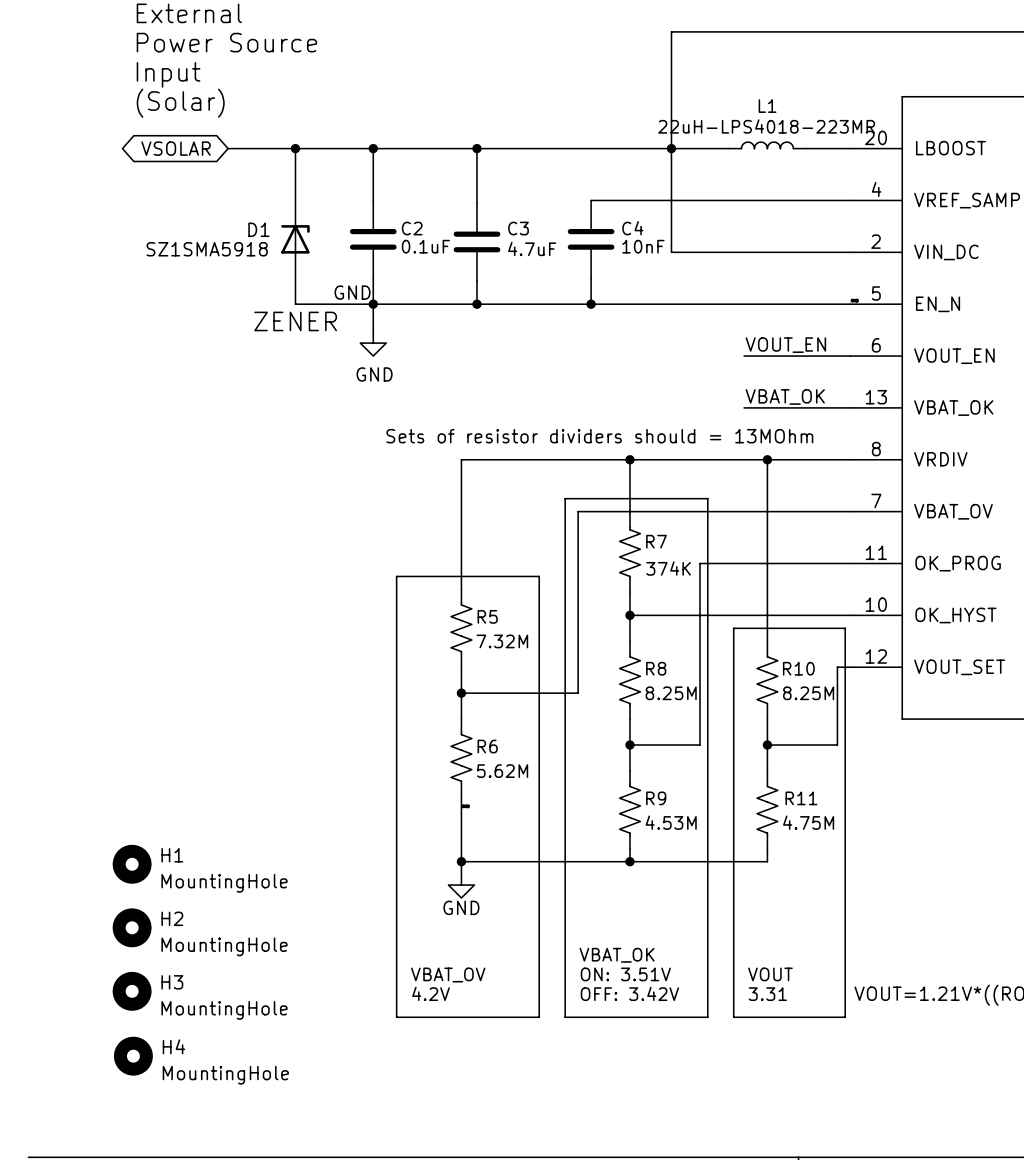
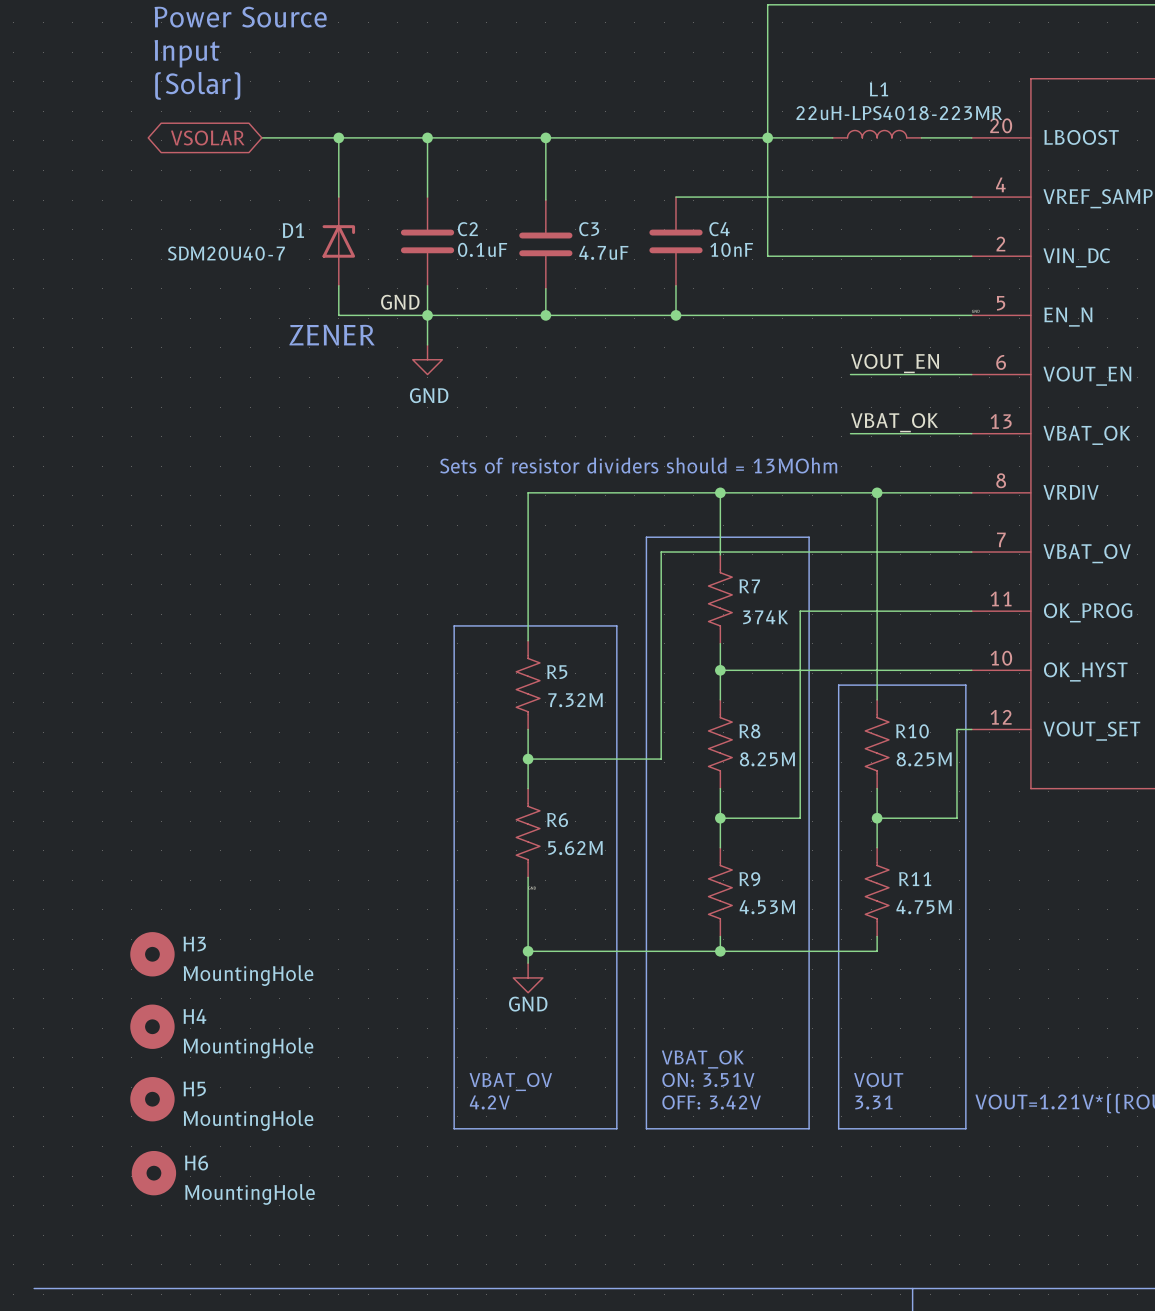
D1 value: SZ1SMA5918 (207, 249) -> SDM20U40-7 (226, 253)
H1 name: H1 (172, 855) -> H3 (194, 944)
H2 name: H2 (172, 918) -> H4 (194, 1016)
H3 name: H3 (172, 982) -> H5 (194, 1088)
H4 name: H4 (173, 1046) -> H6 (196, 1162)

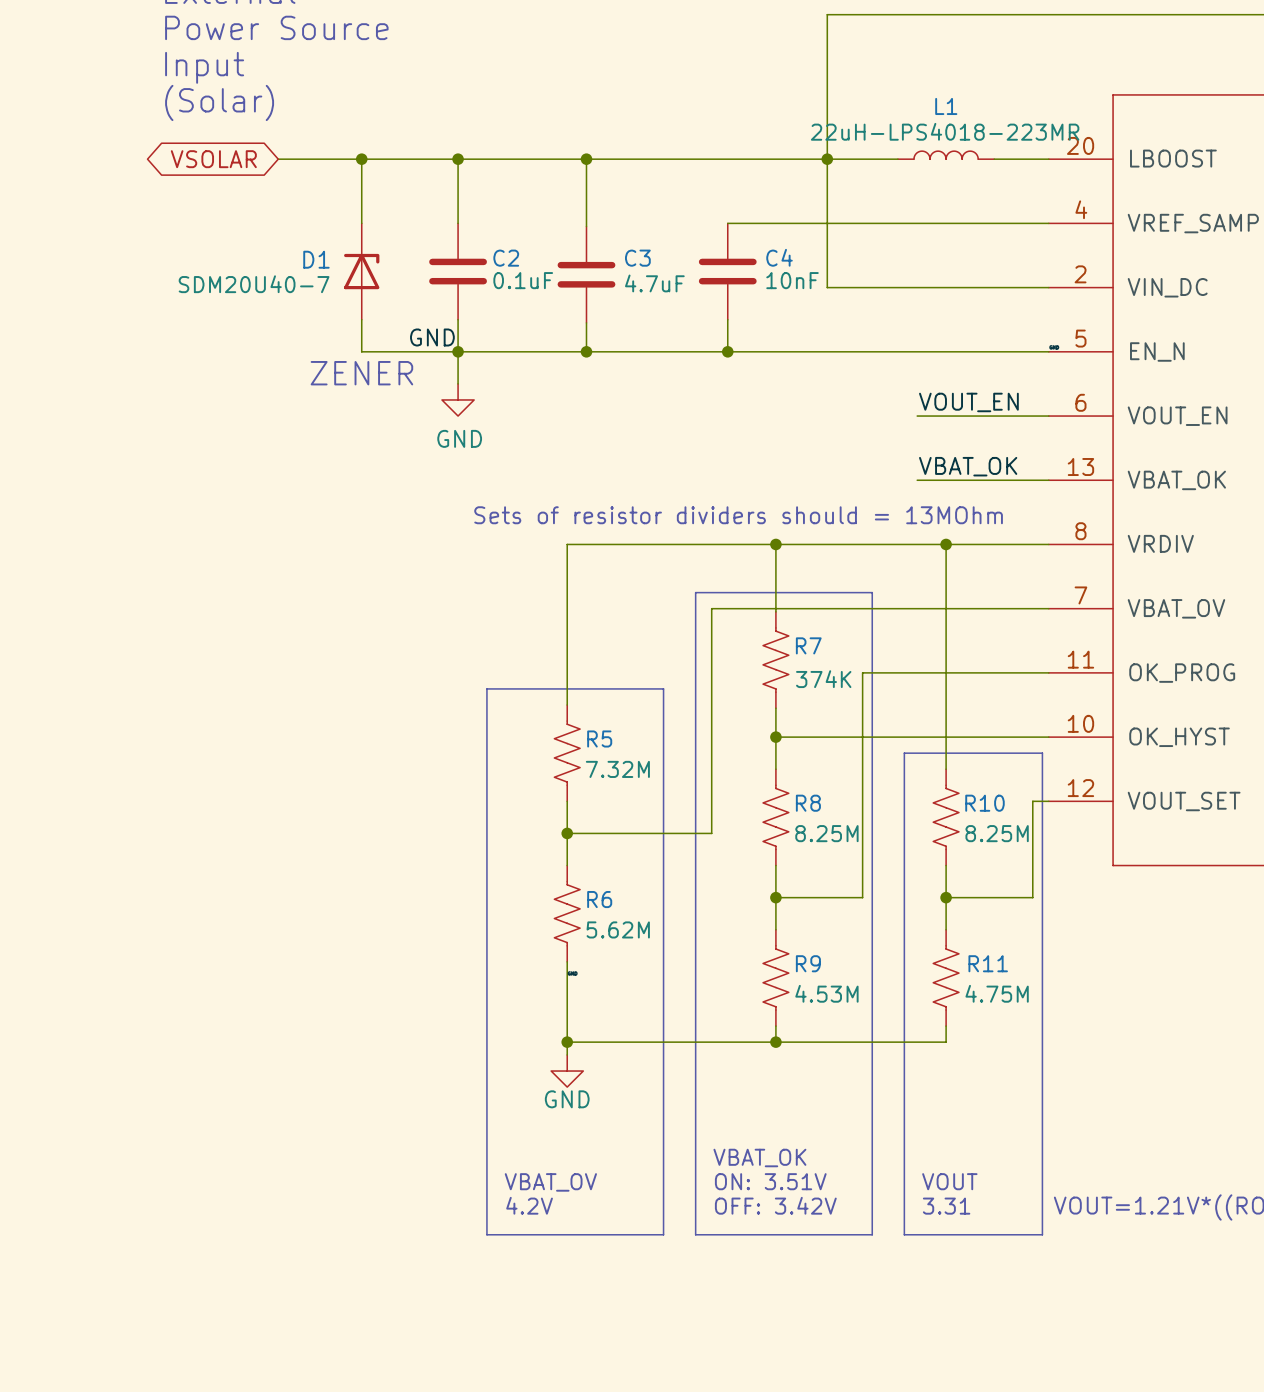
H3: MountingHole (152, 954) -> none
H4: MountingHole (152, 1026) -> none
H5: MountingHole (152, 1099) -> none
H6: MountingHole (153, 1173) -> none

